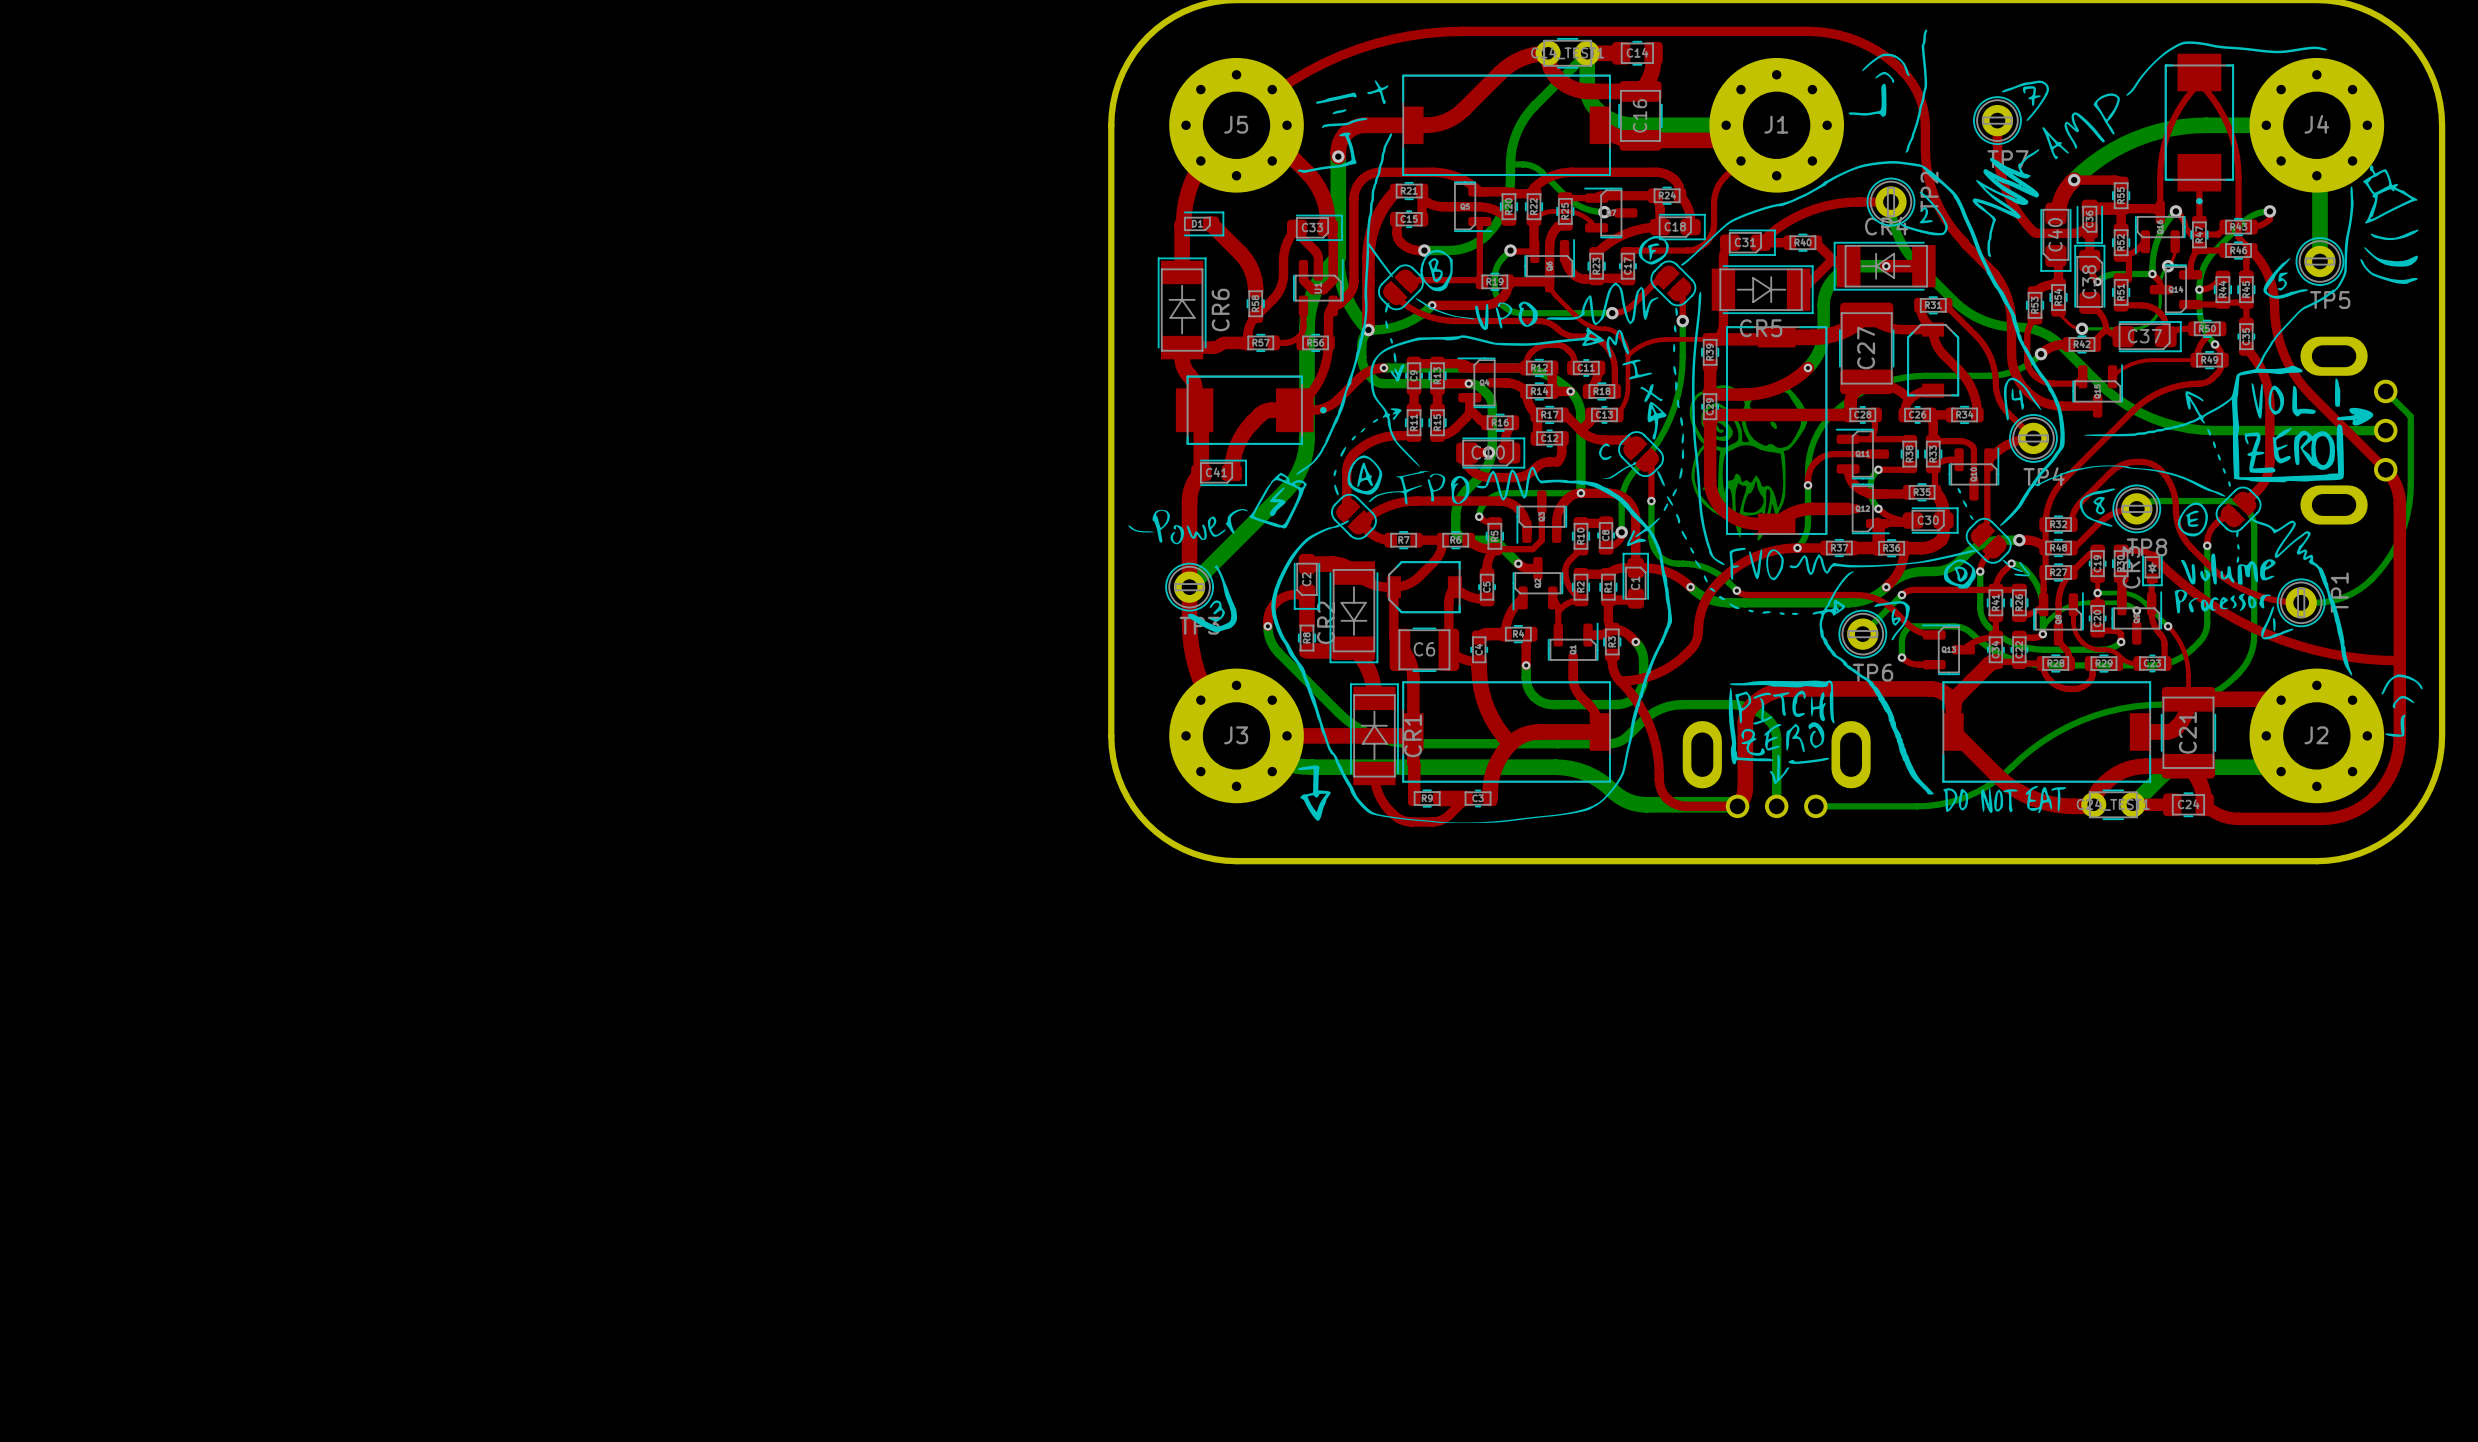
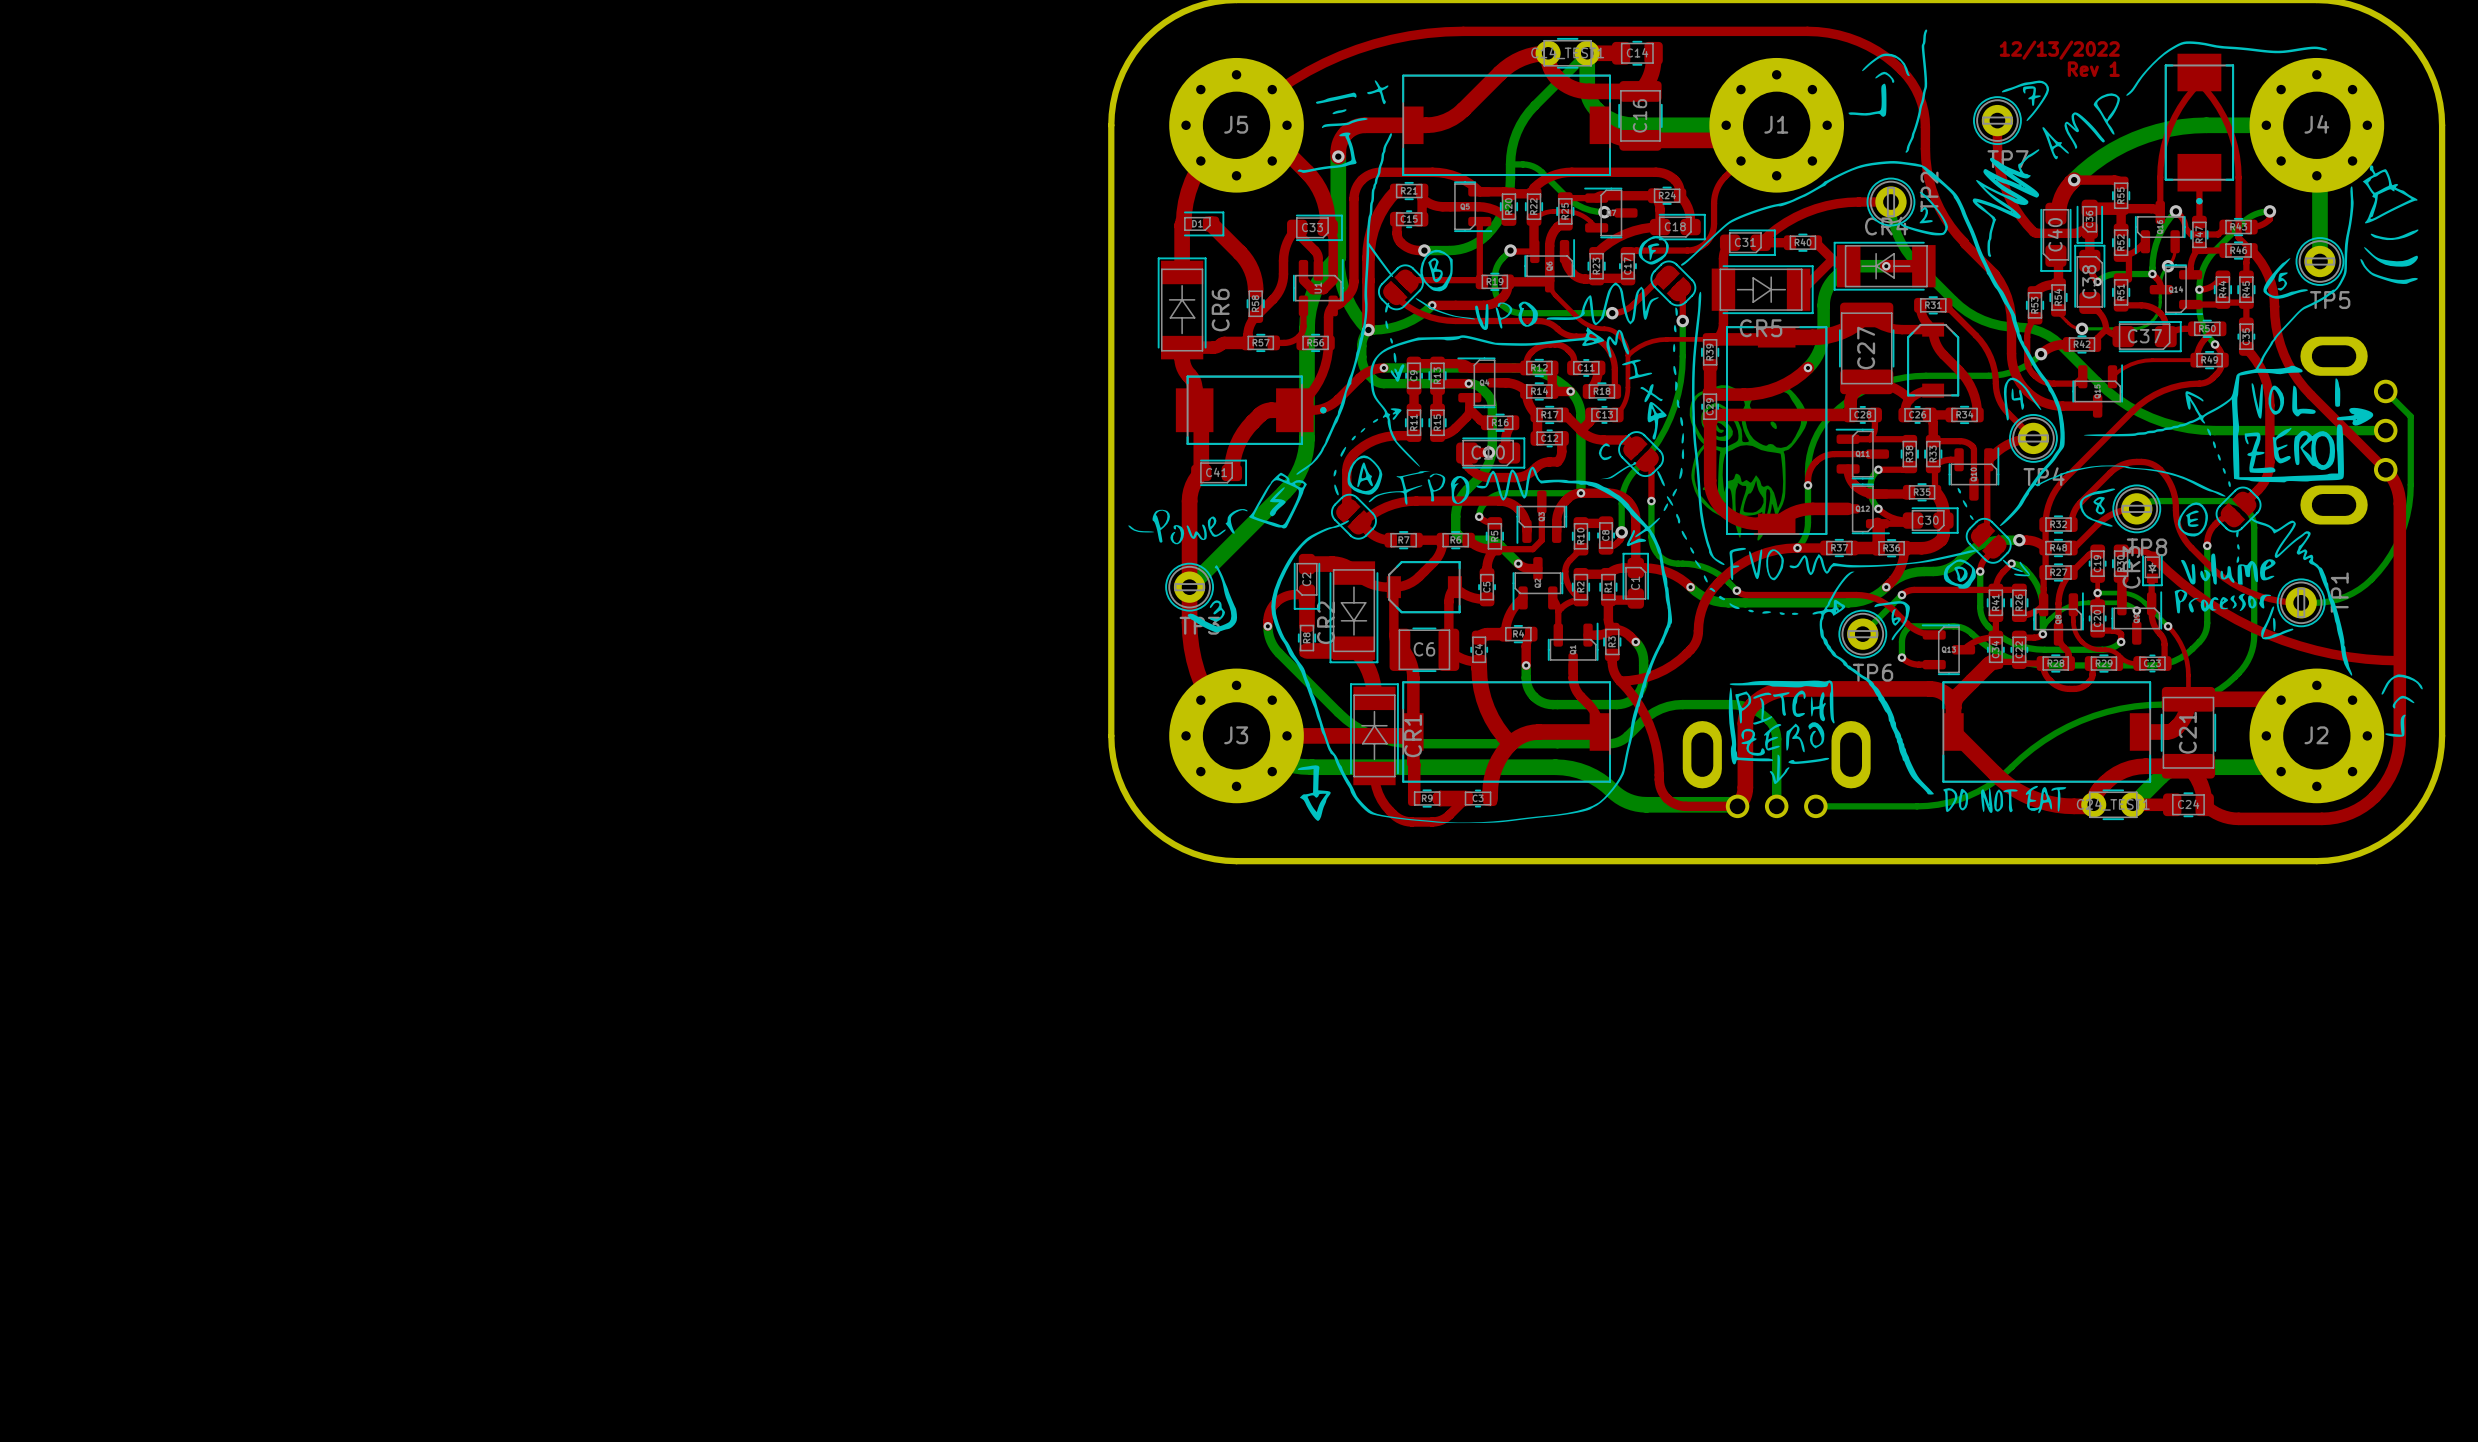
text: none -> 12/13/2022 (2059, 50)
text: none -> Rev 1 (2093, 69)

